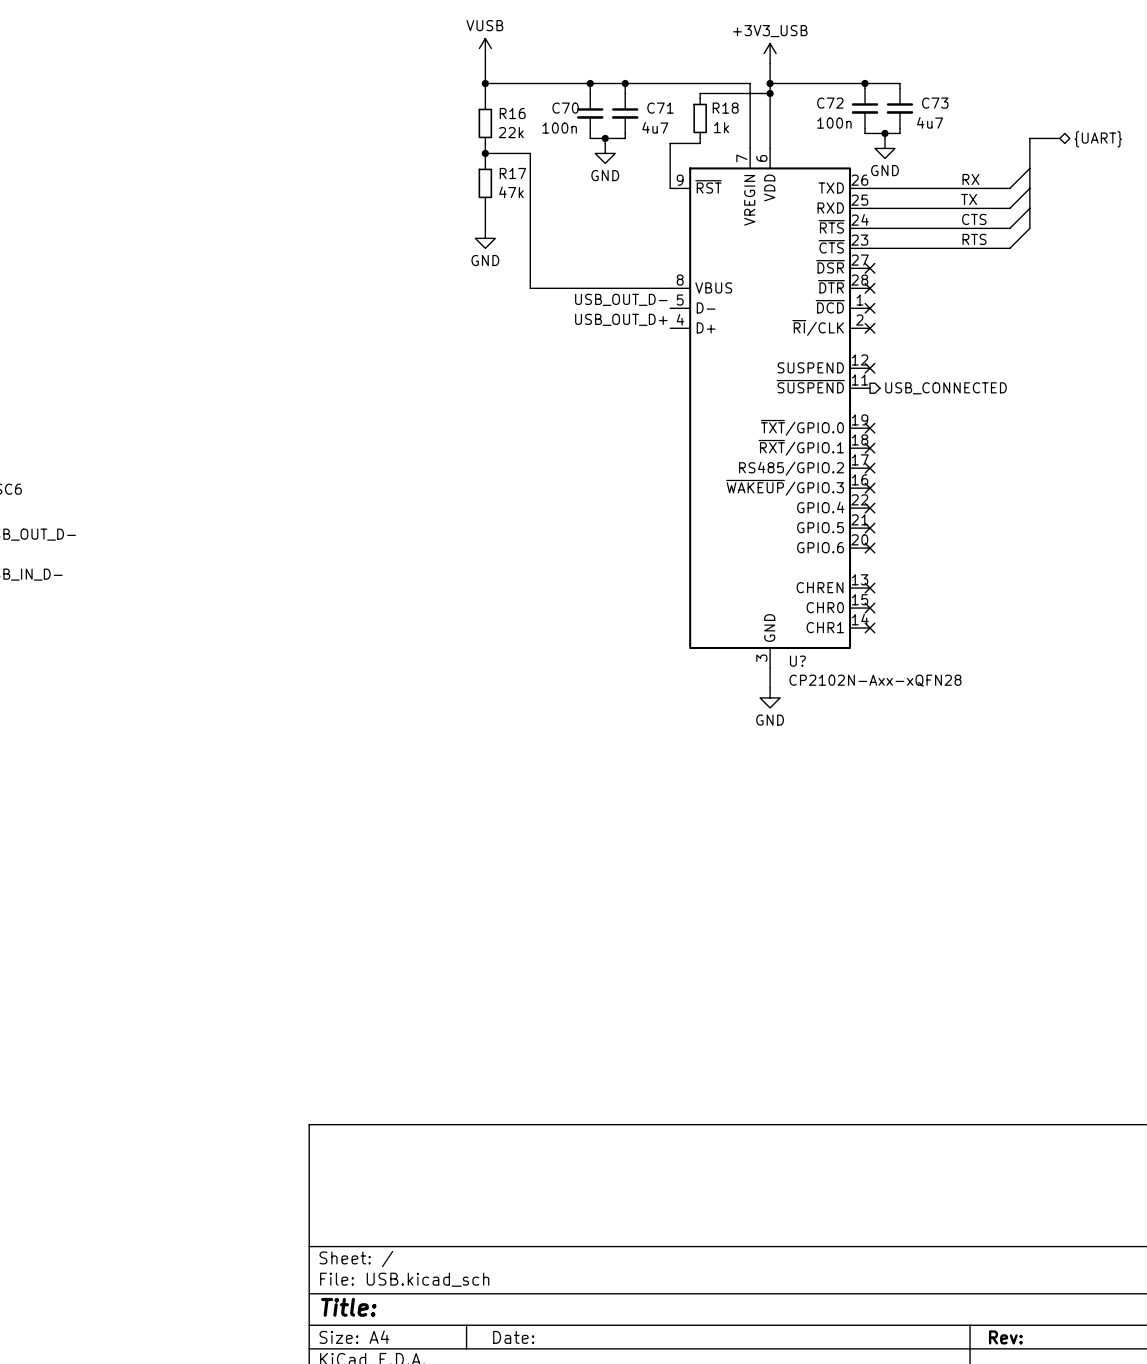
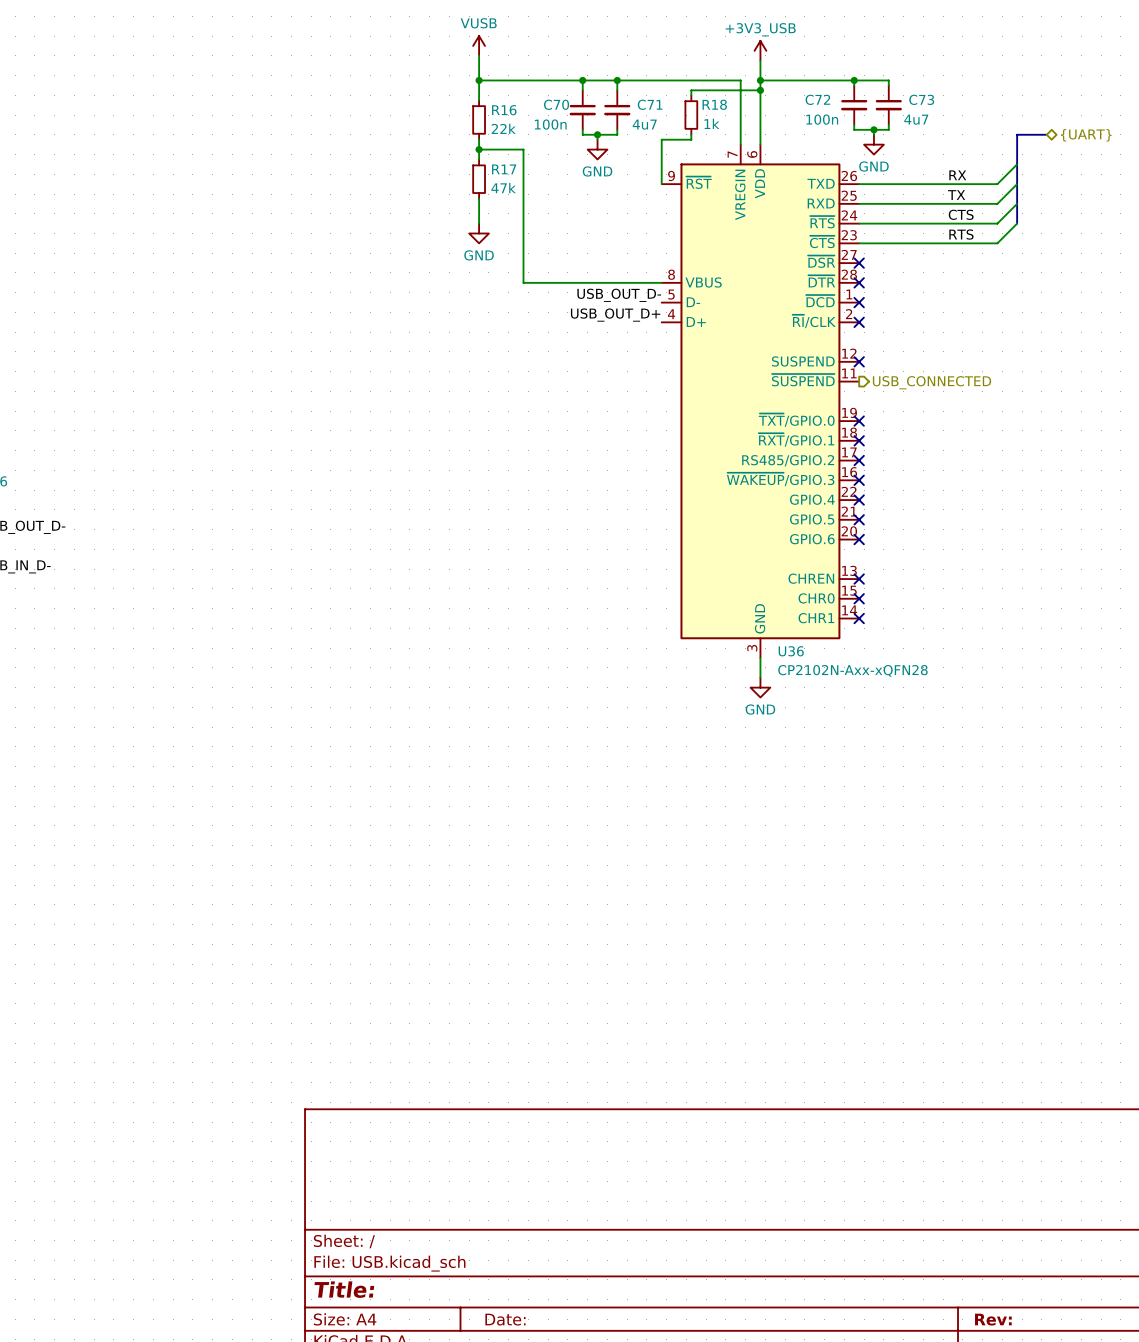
U? name: U? (797, 661) -> U36 (791, 651)

